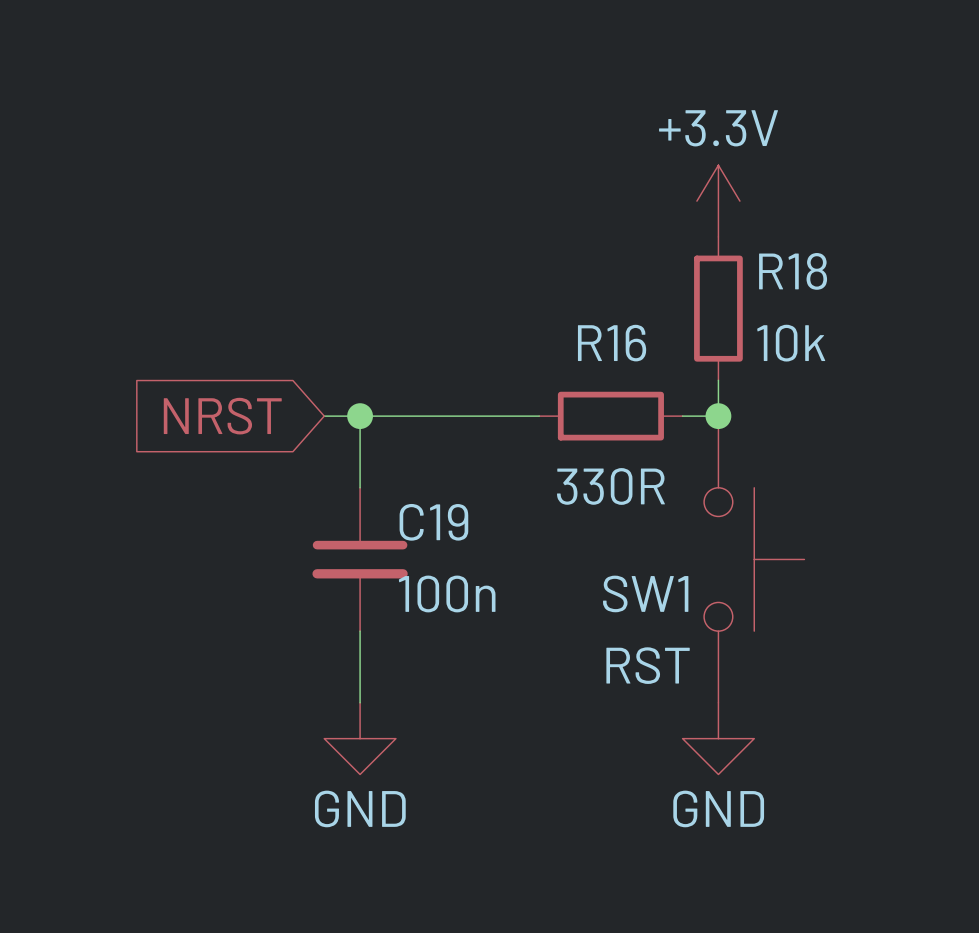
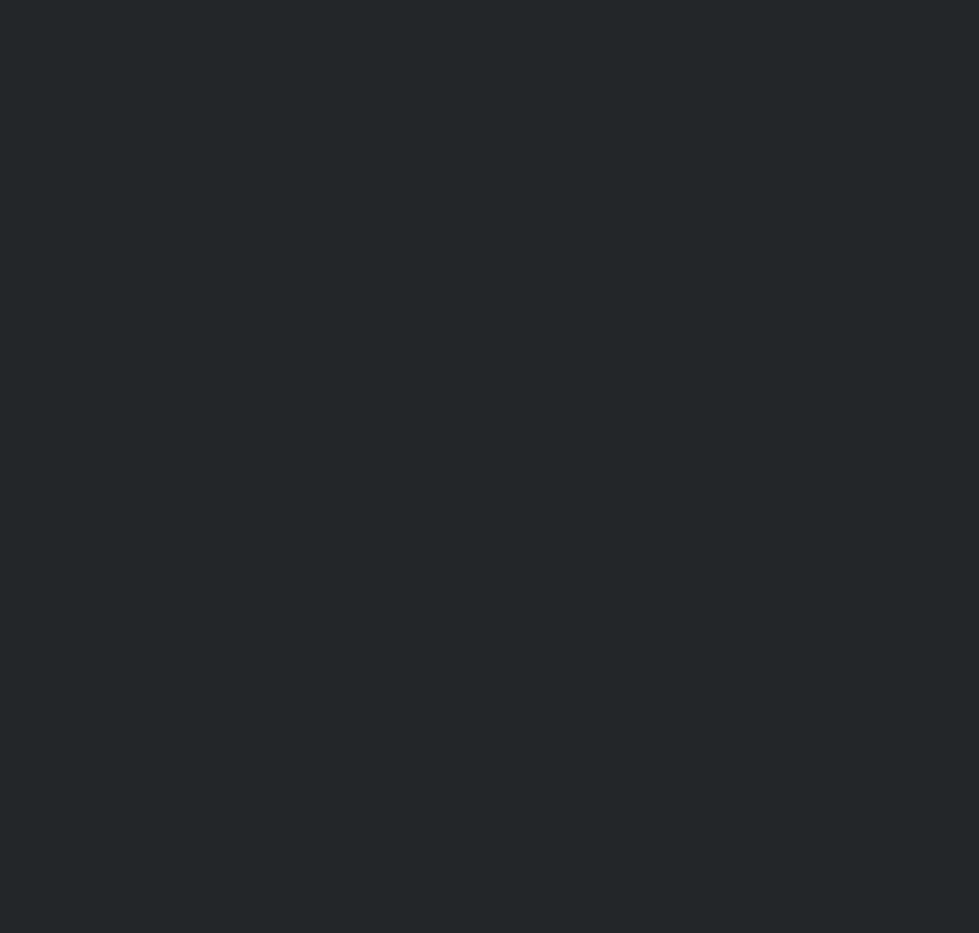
power symbol: +3.3V (718, 201) -> none
R18: 10k (718, 308) -> none
wire: (718, 380) (718, 416) (682, 416) -> none
global label: NRST (222, 416) -> none
wire: (324, 416) (539, 416) -> none
wire: (360, 416) (360, 487) -> none
junction: (360, 416) -> none
R16: 330R (610, 416) -> none
junction: (718, 416) -> none
C19: 100n (360, 559) -> none
SW1: RST (754, 559) -> none
wire: (360, 631) (360, 702) -> none
power symbol: GND (360, 738) -> none
power symbol: GND (718, 738) -> none

